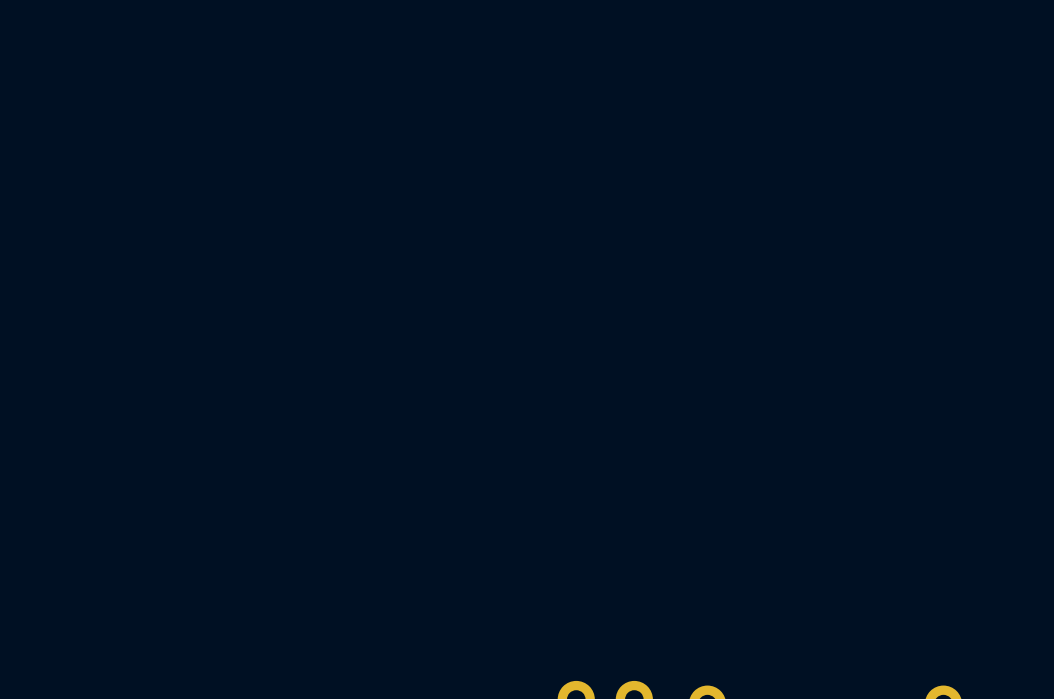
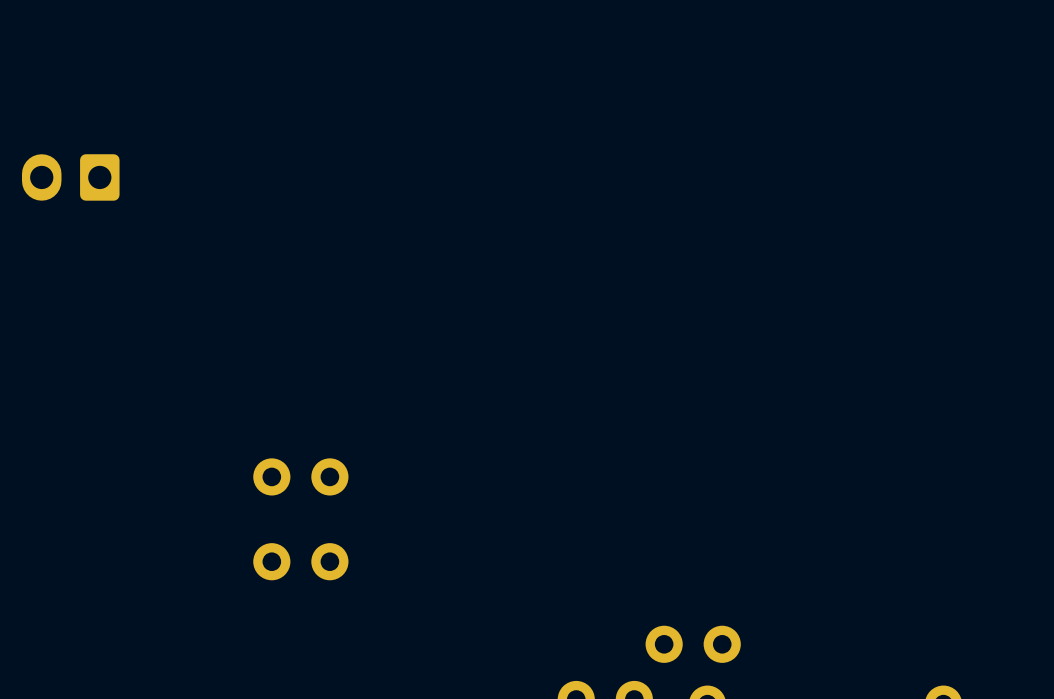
part: none -> (70, 177)
part: none -> (300, 476)
part: none -> (300, 561)
part: none -> (693, 644)

